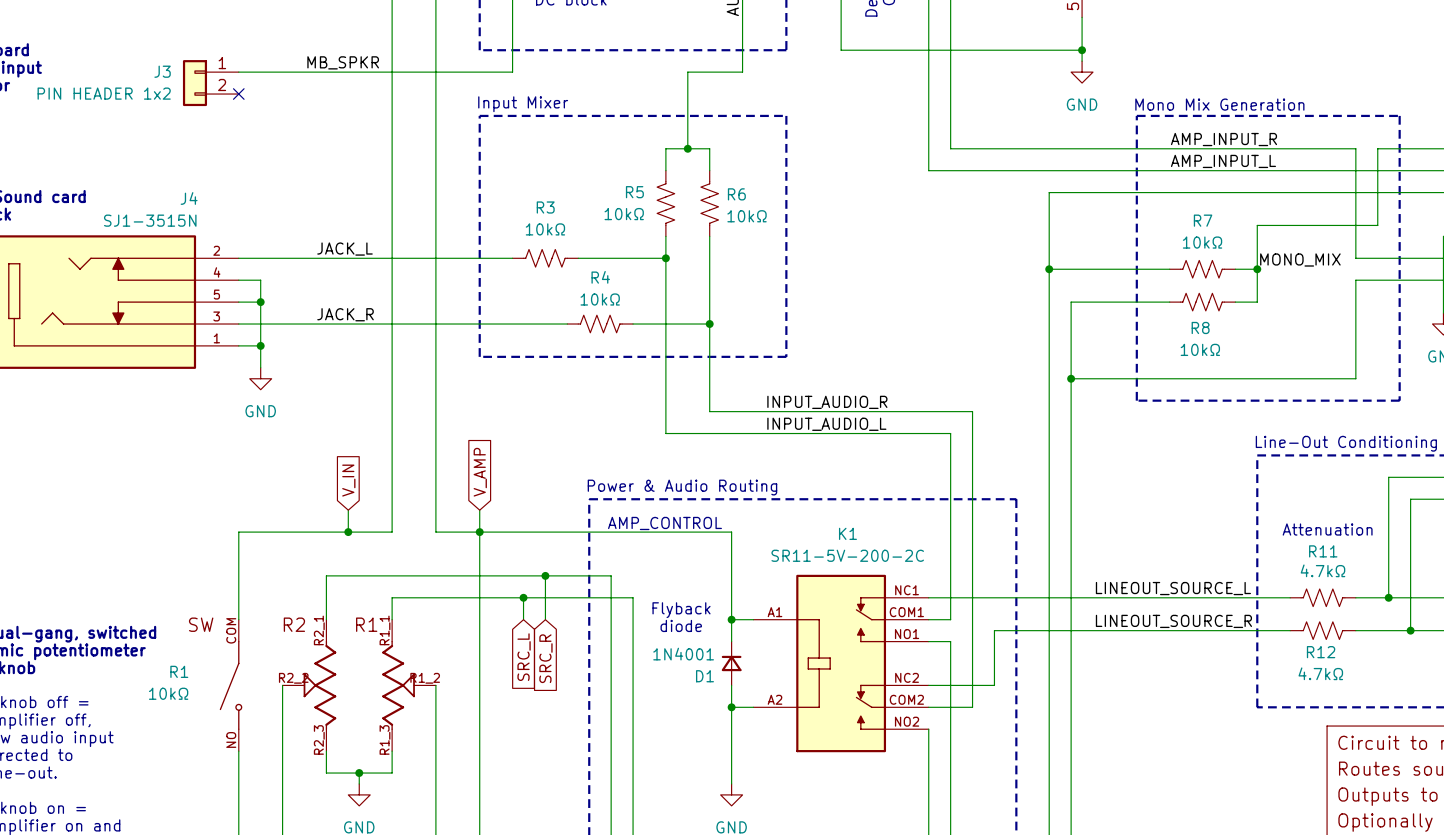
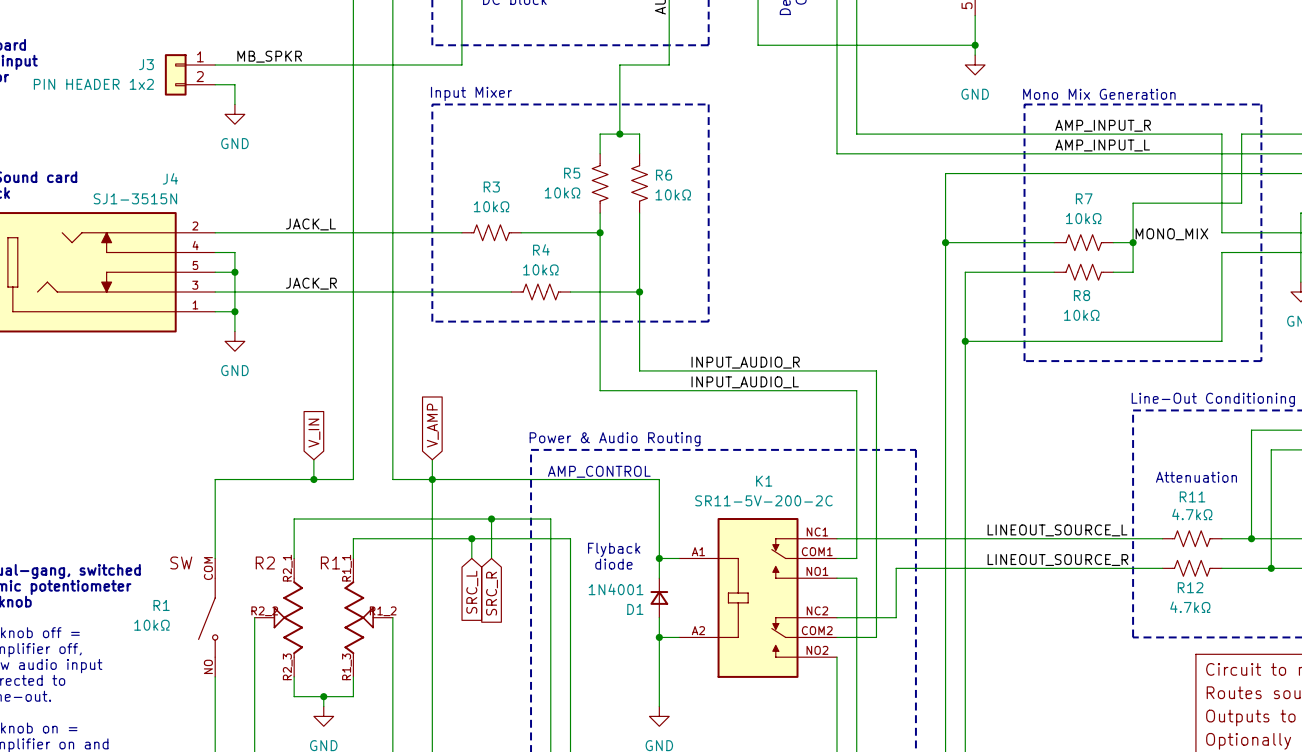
label position: MB_SPKR (343, 62) -> MB_SPKR (269, 56)
wire: none -> (215, 84) (234, 84) (234, 104)
no-connect mark: (238, 94) -> none
power symbol: none -> GND (234, 114)

